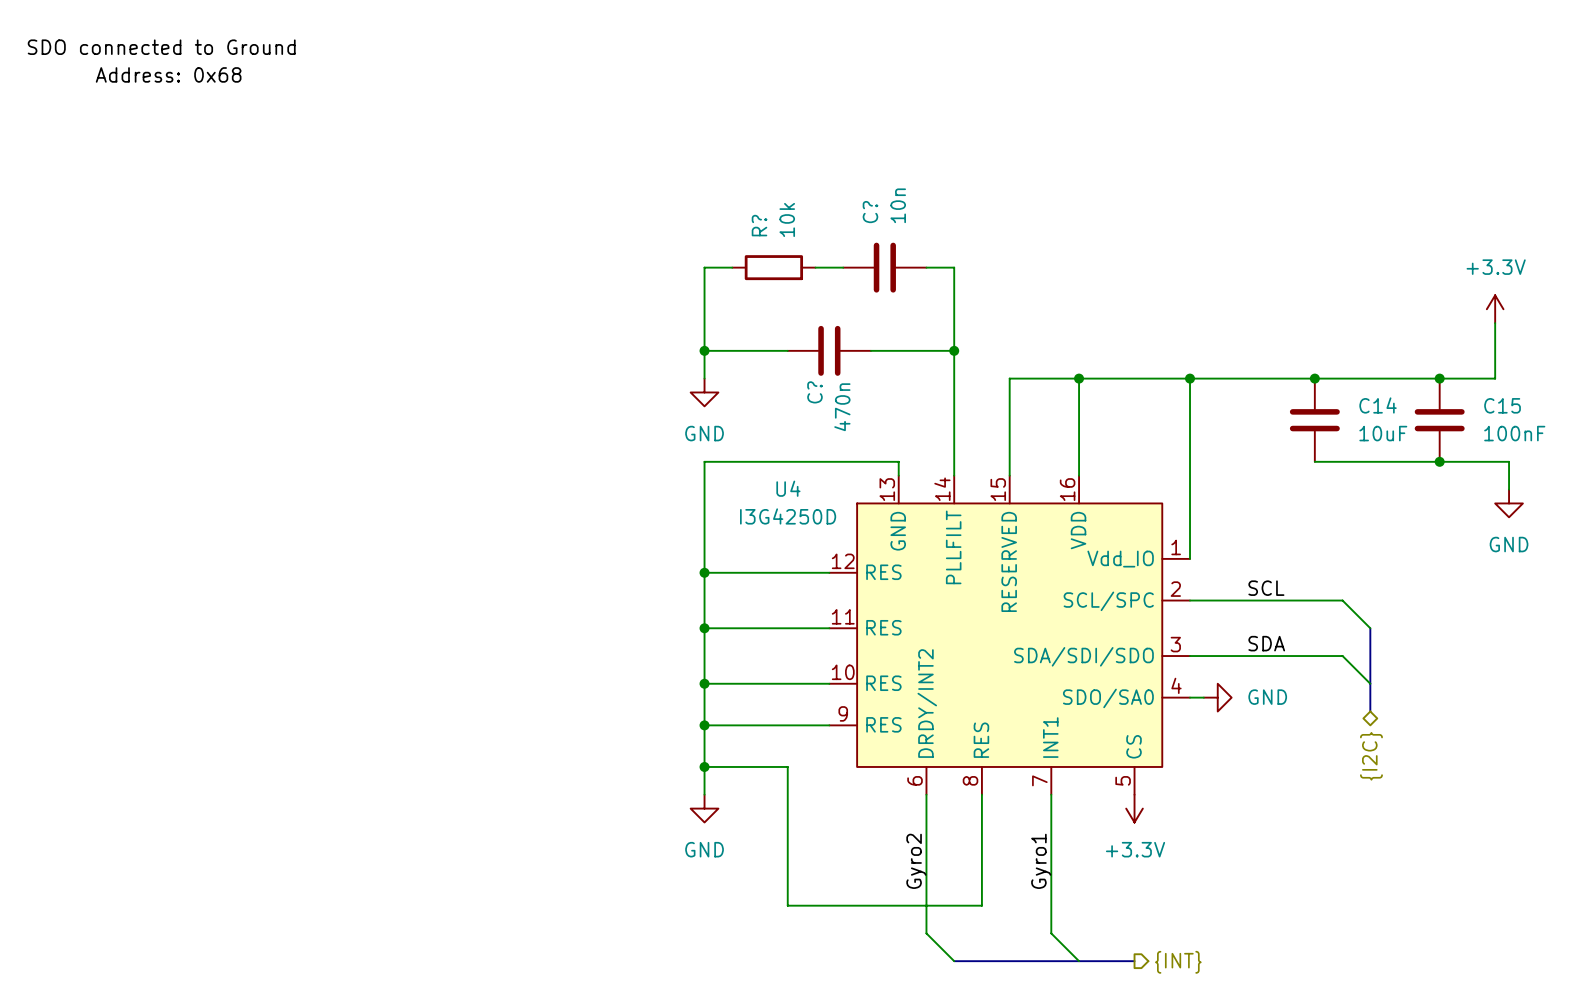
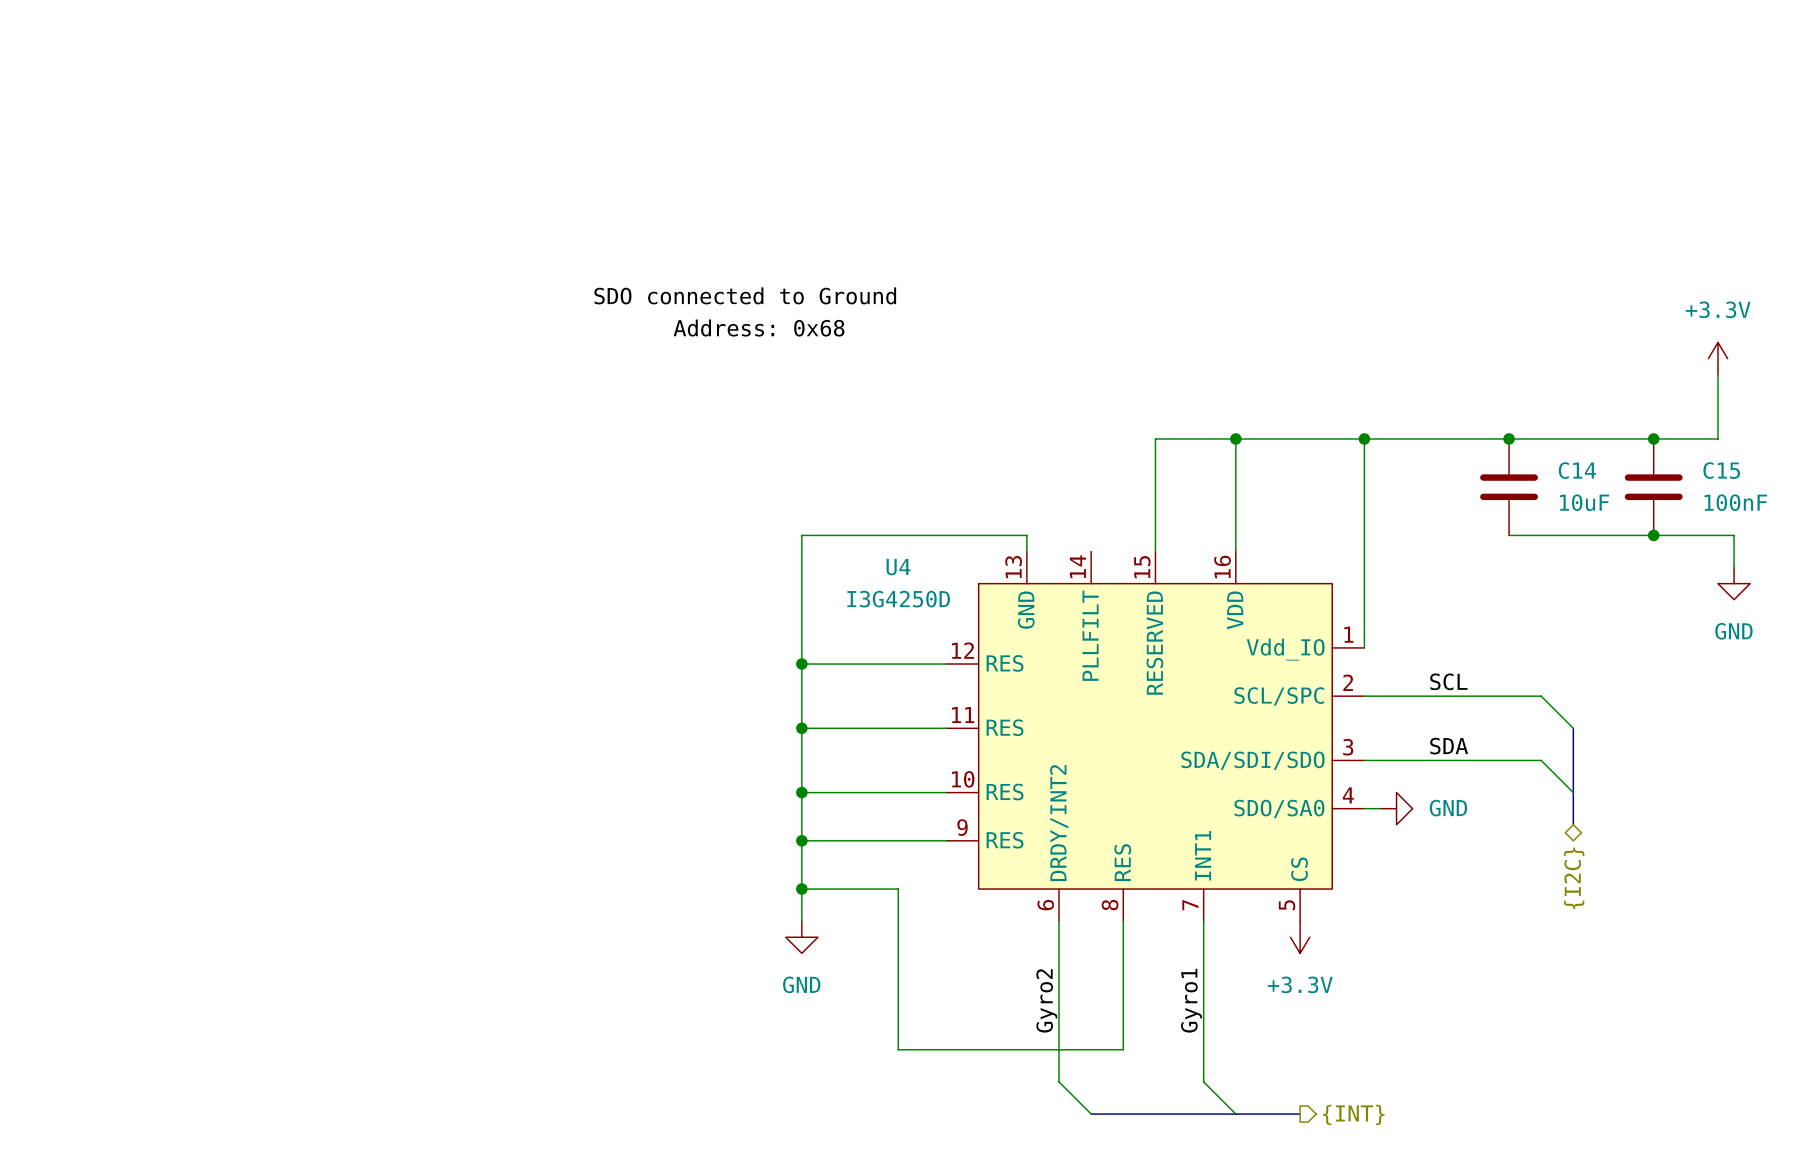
label: SDO connected to Ground (161, 47) -> none
label: Address: 0x68 (168, 74) -> none
label: none -> SDO connected to Ground (745, 295)
wire: (732, 267) (704, 267) (704, 378) -> none
R?: 10k (773, 267) -> none
wire: (815, 267) (843, 267) -> none
C?: 10n (884, 267) -> none
wire: (926, 267) (954, 267) (954, 475) -> none
label: none -> Address: 0x68 (759, 328)
wire: (704, 350) (787, 350) -> none
junction: (704, 350) -> none
C?: 470n (829, 350) -> none
wire: (870, 350) (954, 350) -> none
junction: (954, 350) -> none
power symbol: GND (704, 392) -> none

